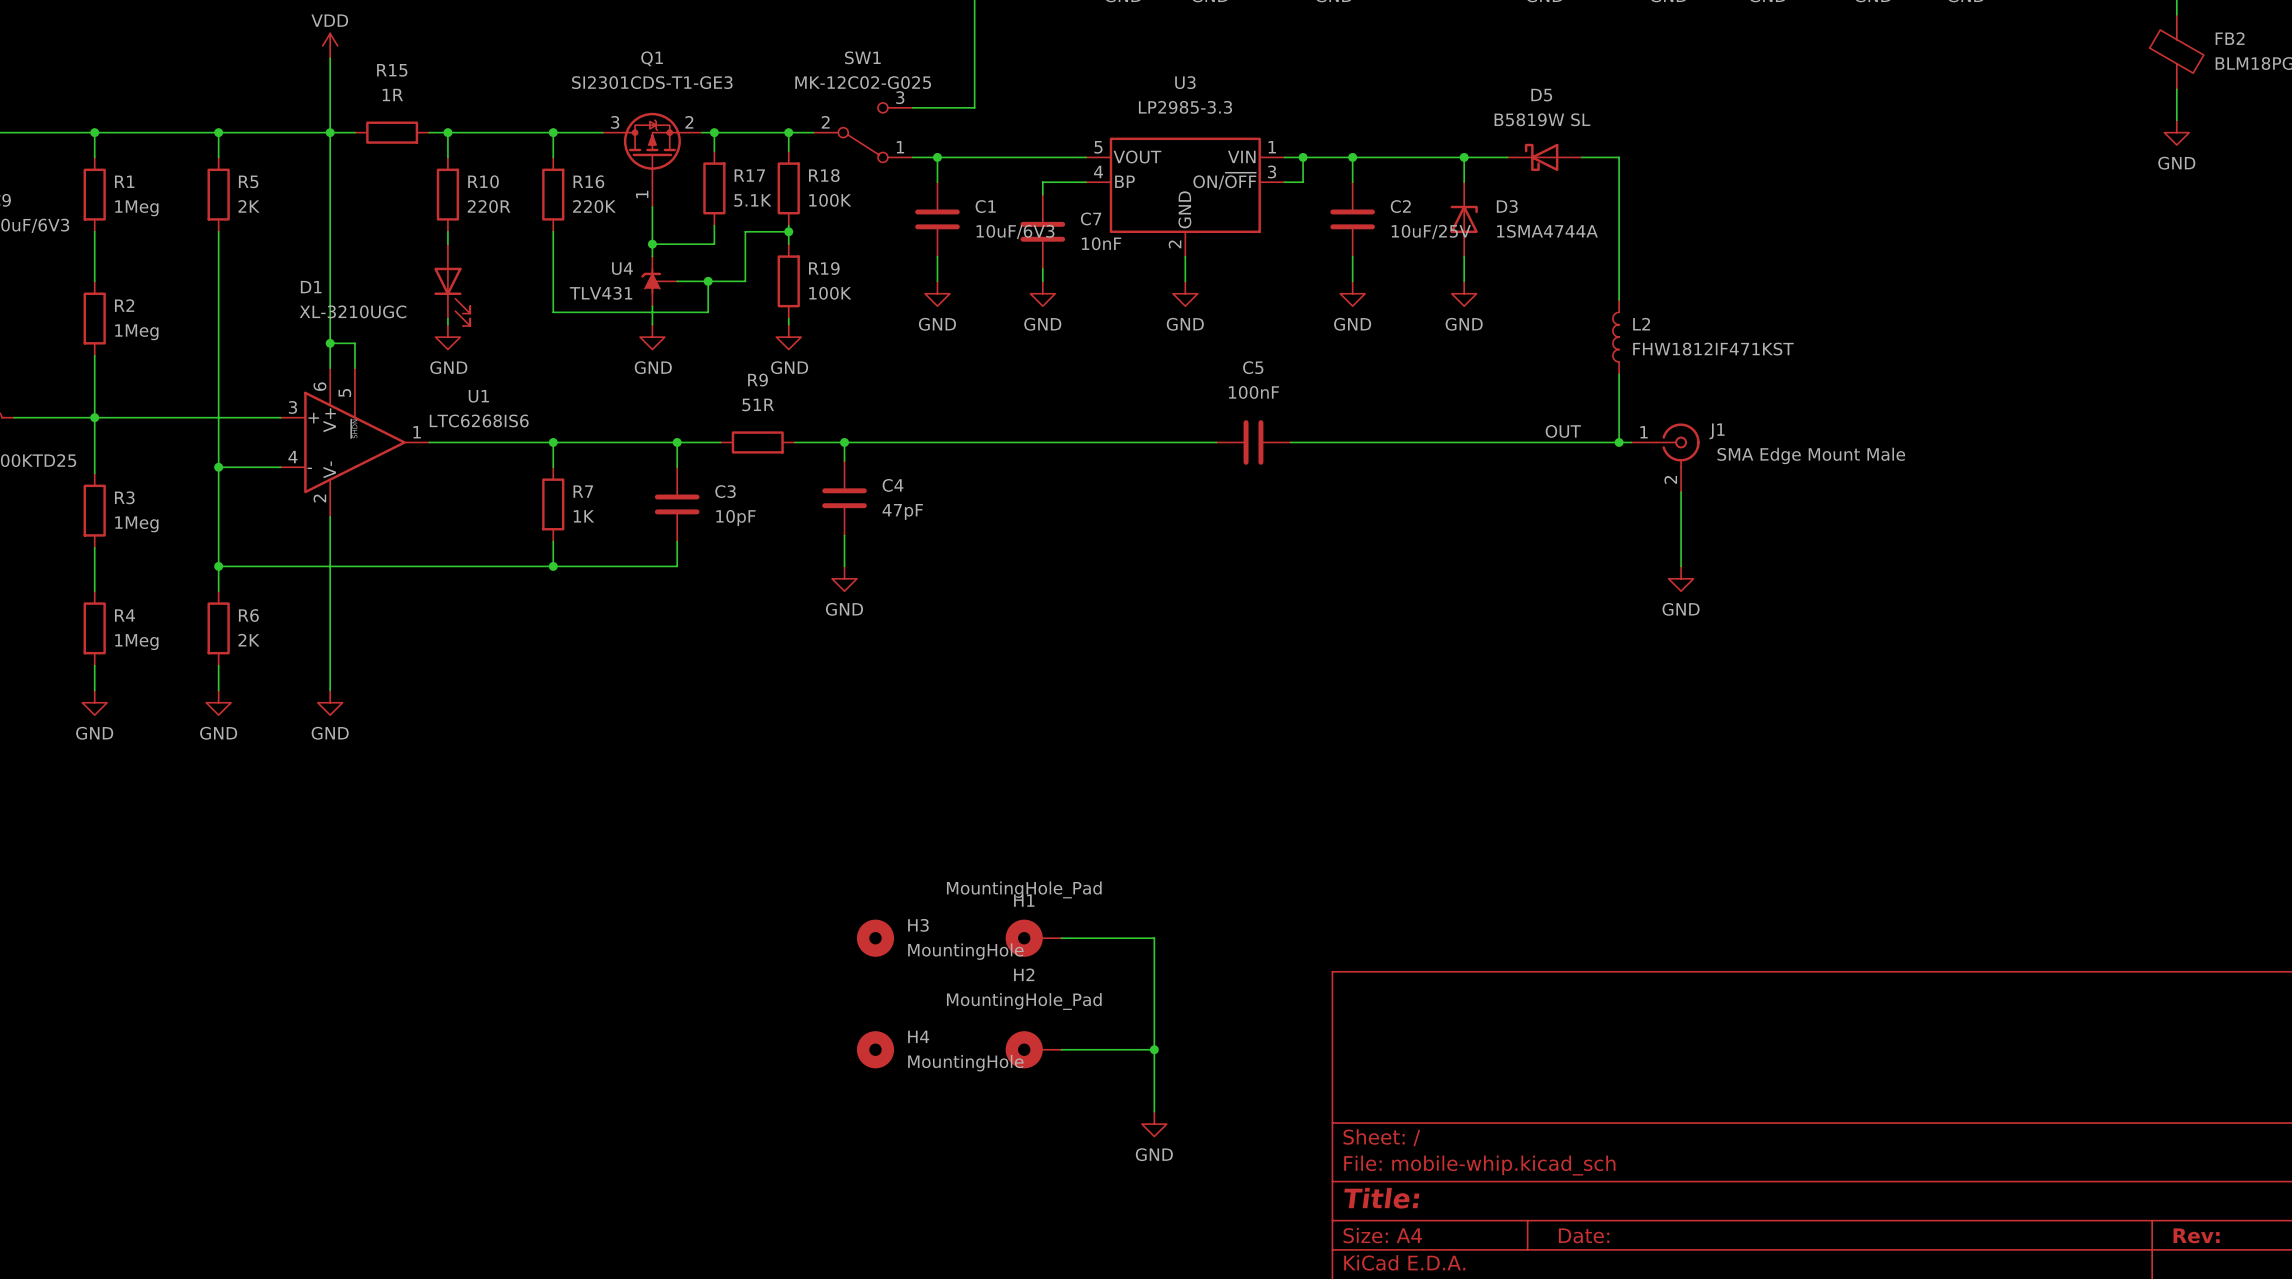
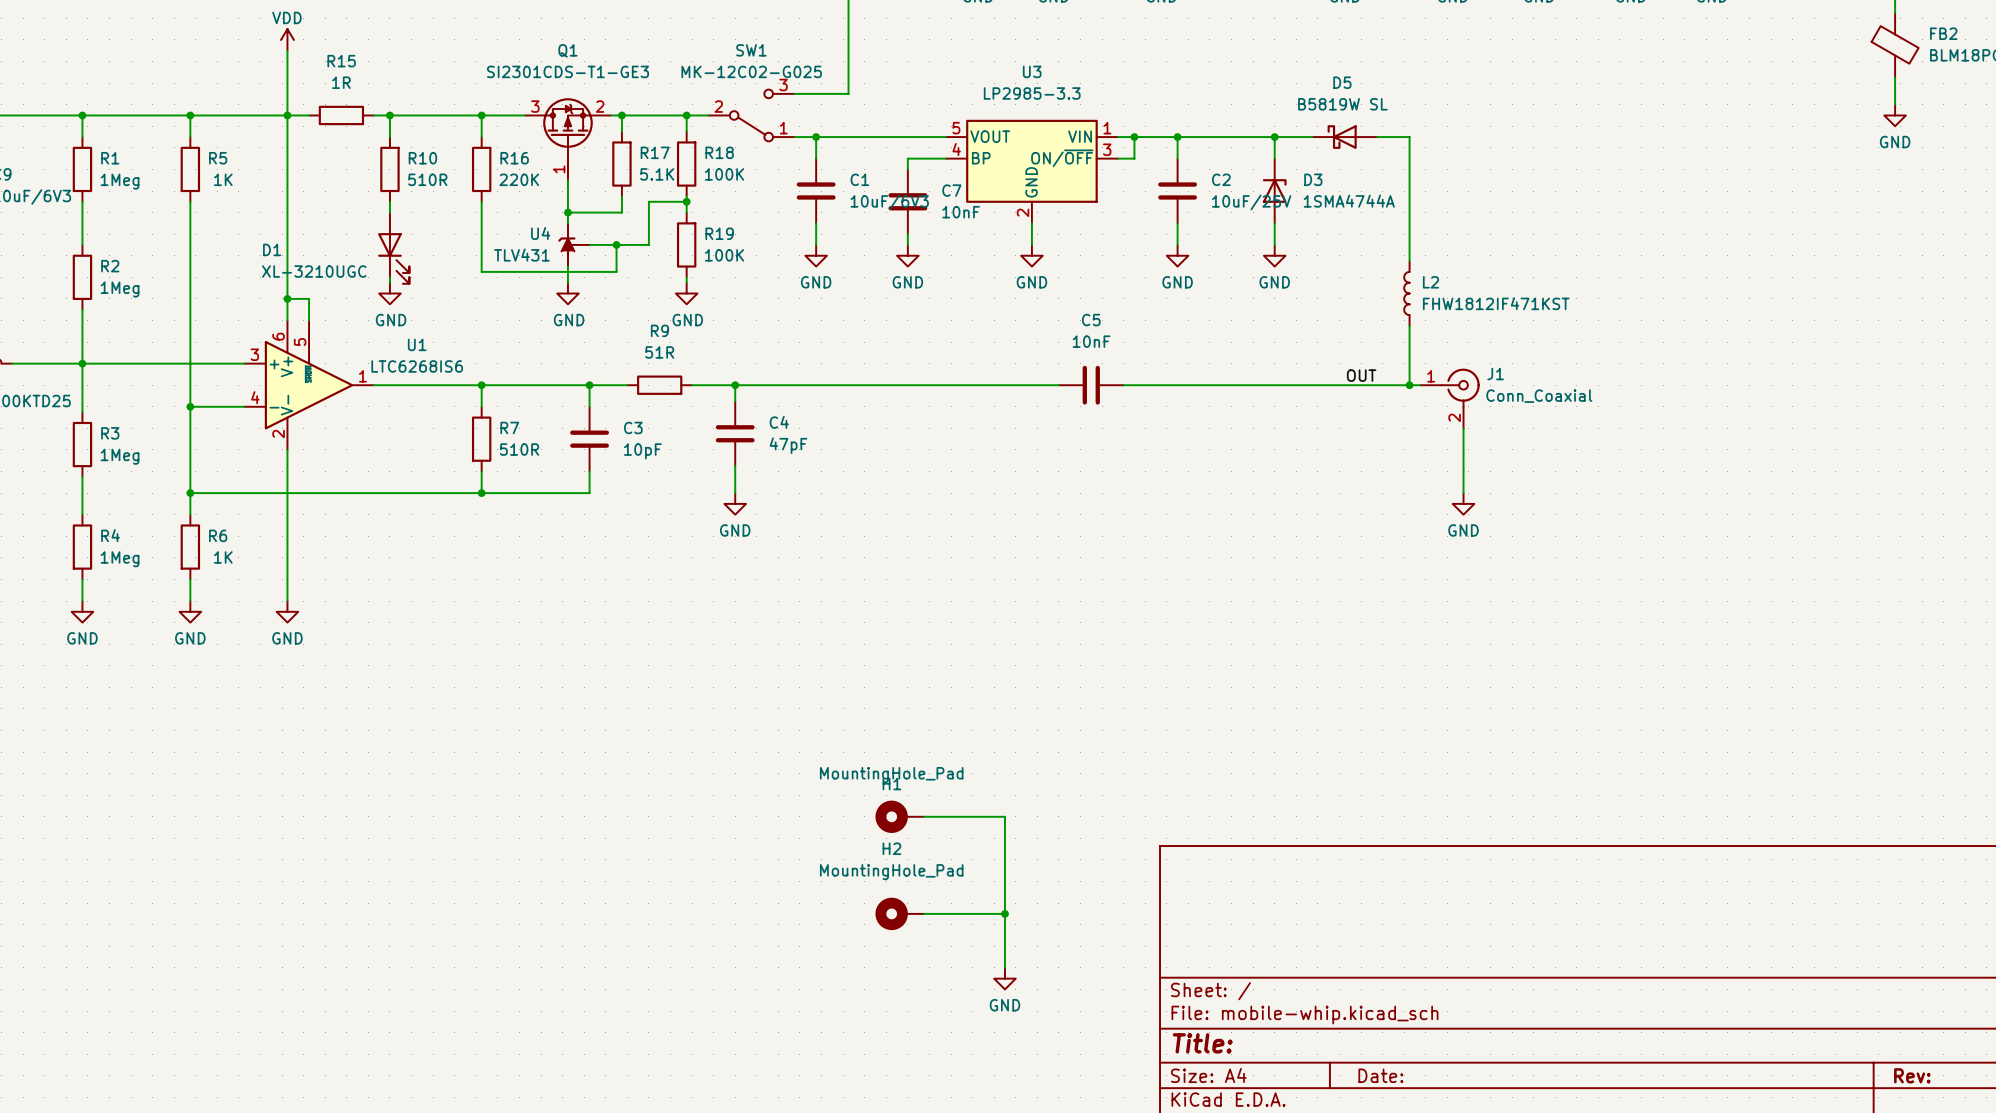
R5 value: 2K (249, 206) -> 1K (223, 179)
R10 value: 220R (489, 206) -> 510R (427, 179)
C5 value: 100nF (1253, 392) -> 10nF (1091, 341)
J1 value: SMA Edge Mount Male (1811, 455) -> Conn_Coaxial (1539, 396)
R7 value: 1K (583, 516) -> 510R (519, 449)
R6 value: 2K (249, 640) -> 1K (223, 557)
H3: MountingHole (875, 938) -> none
H4: MountingHole (875, 1049) -> none

